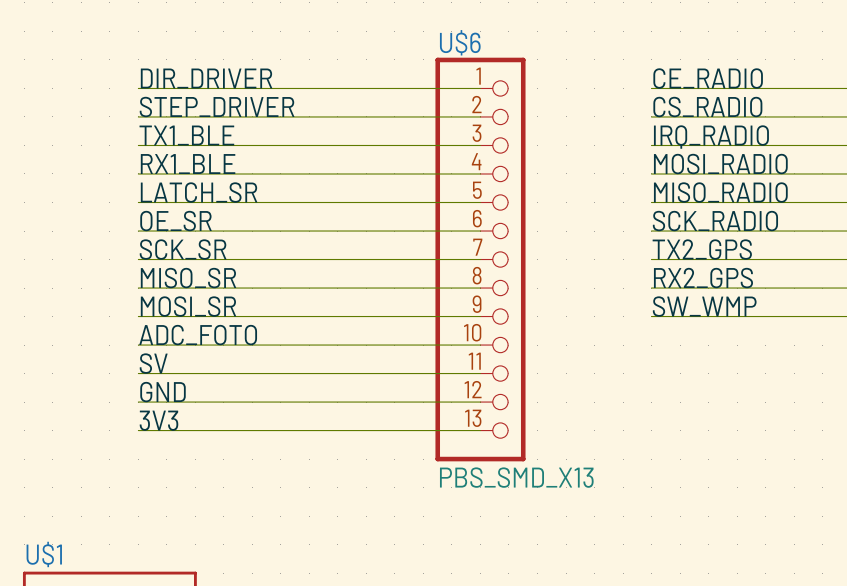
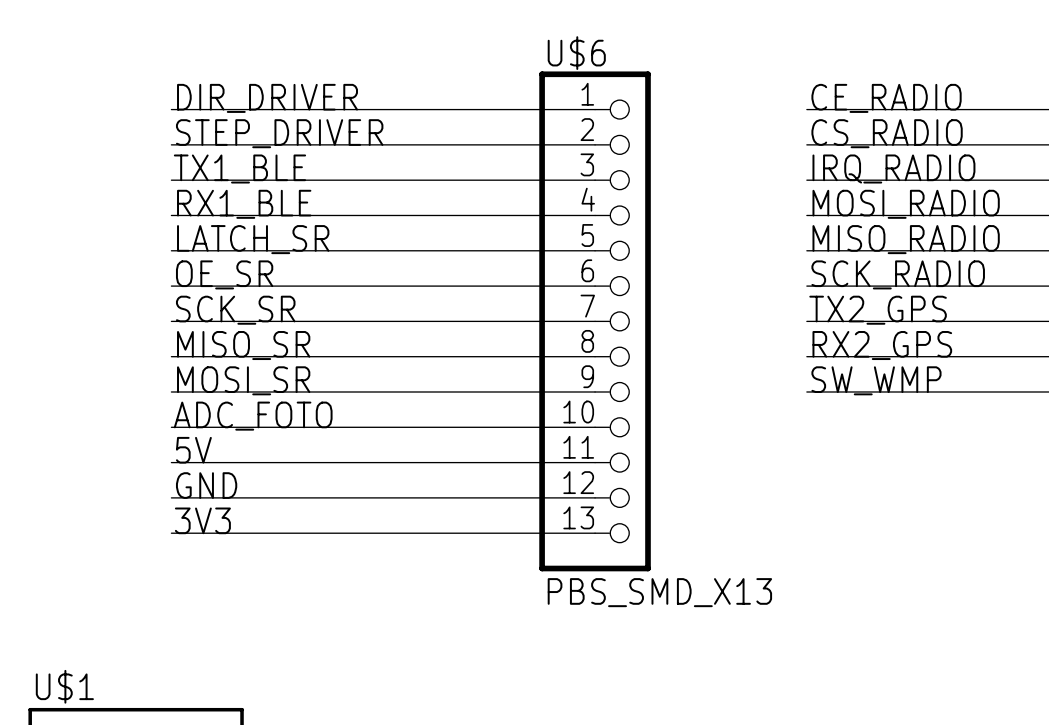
label: SV (153, 363) -> 5V (193, 450)

